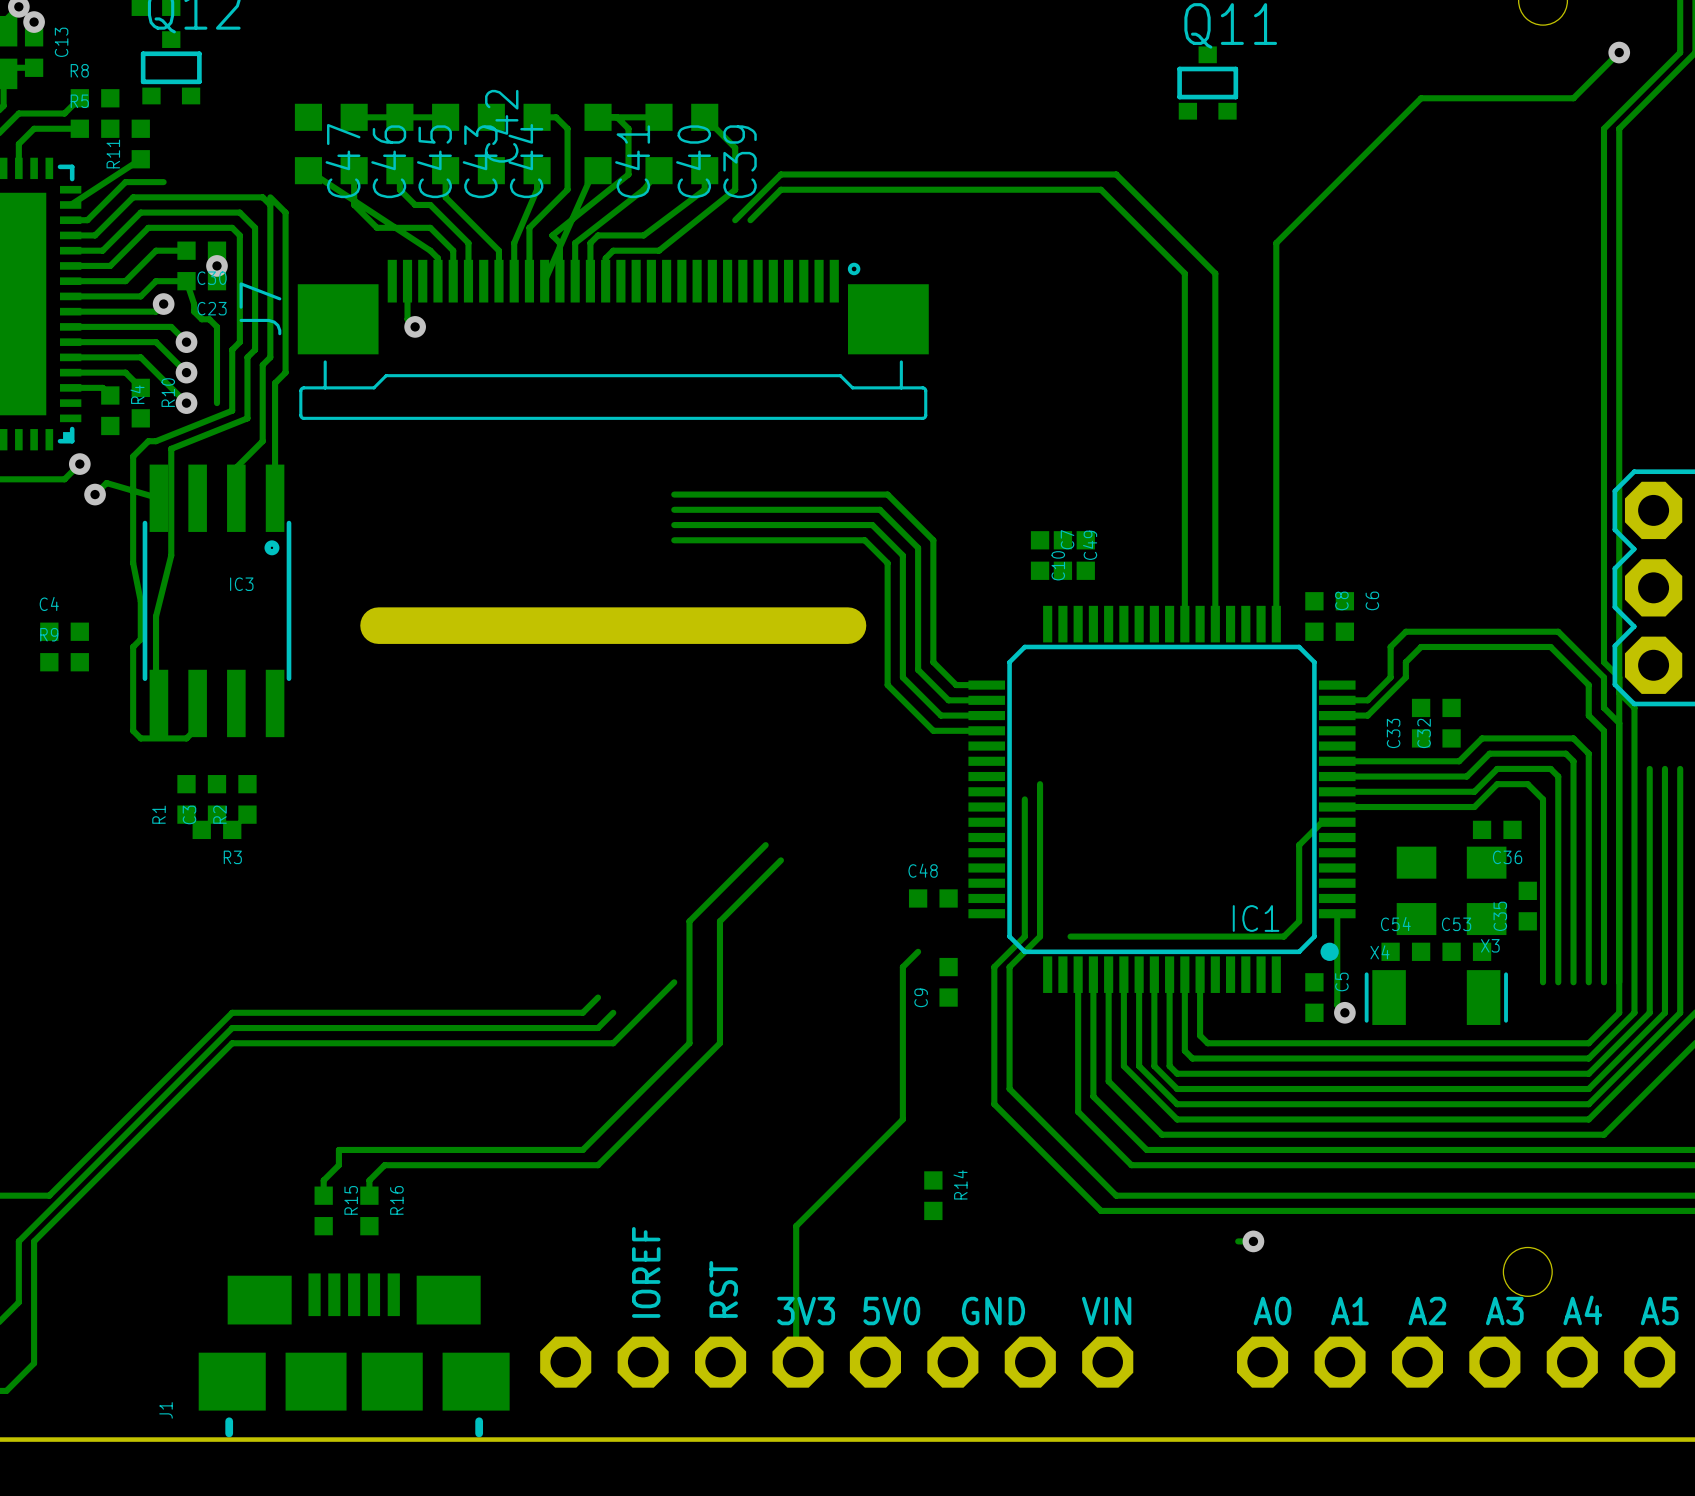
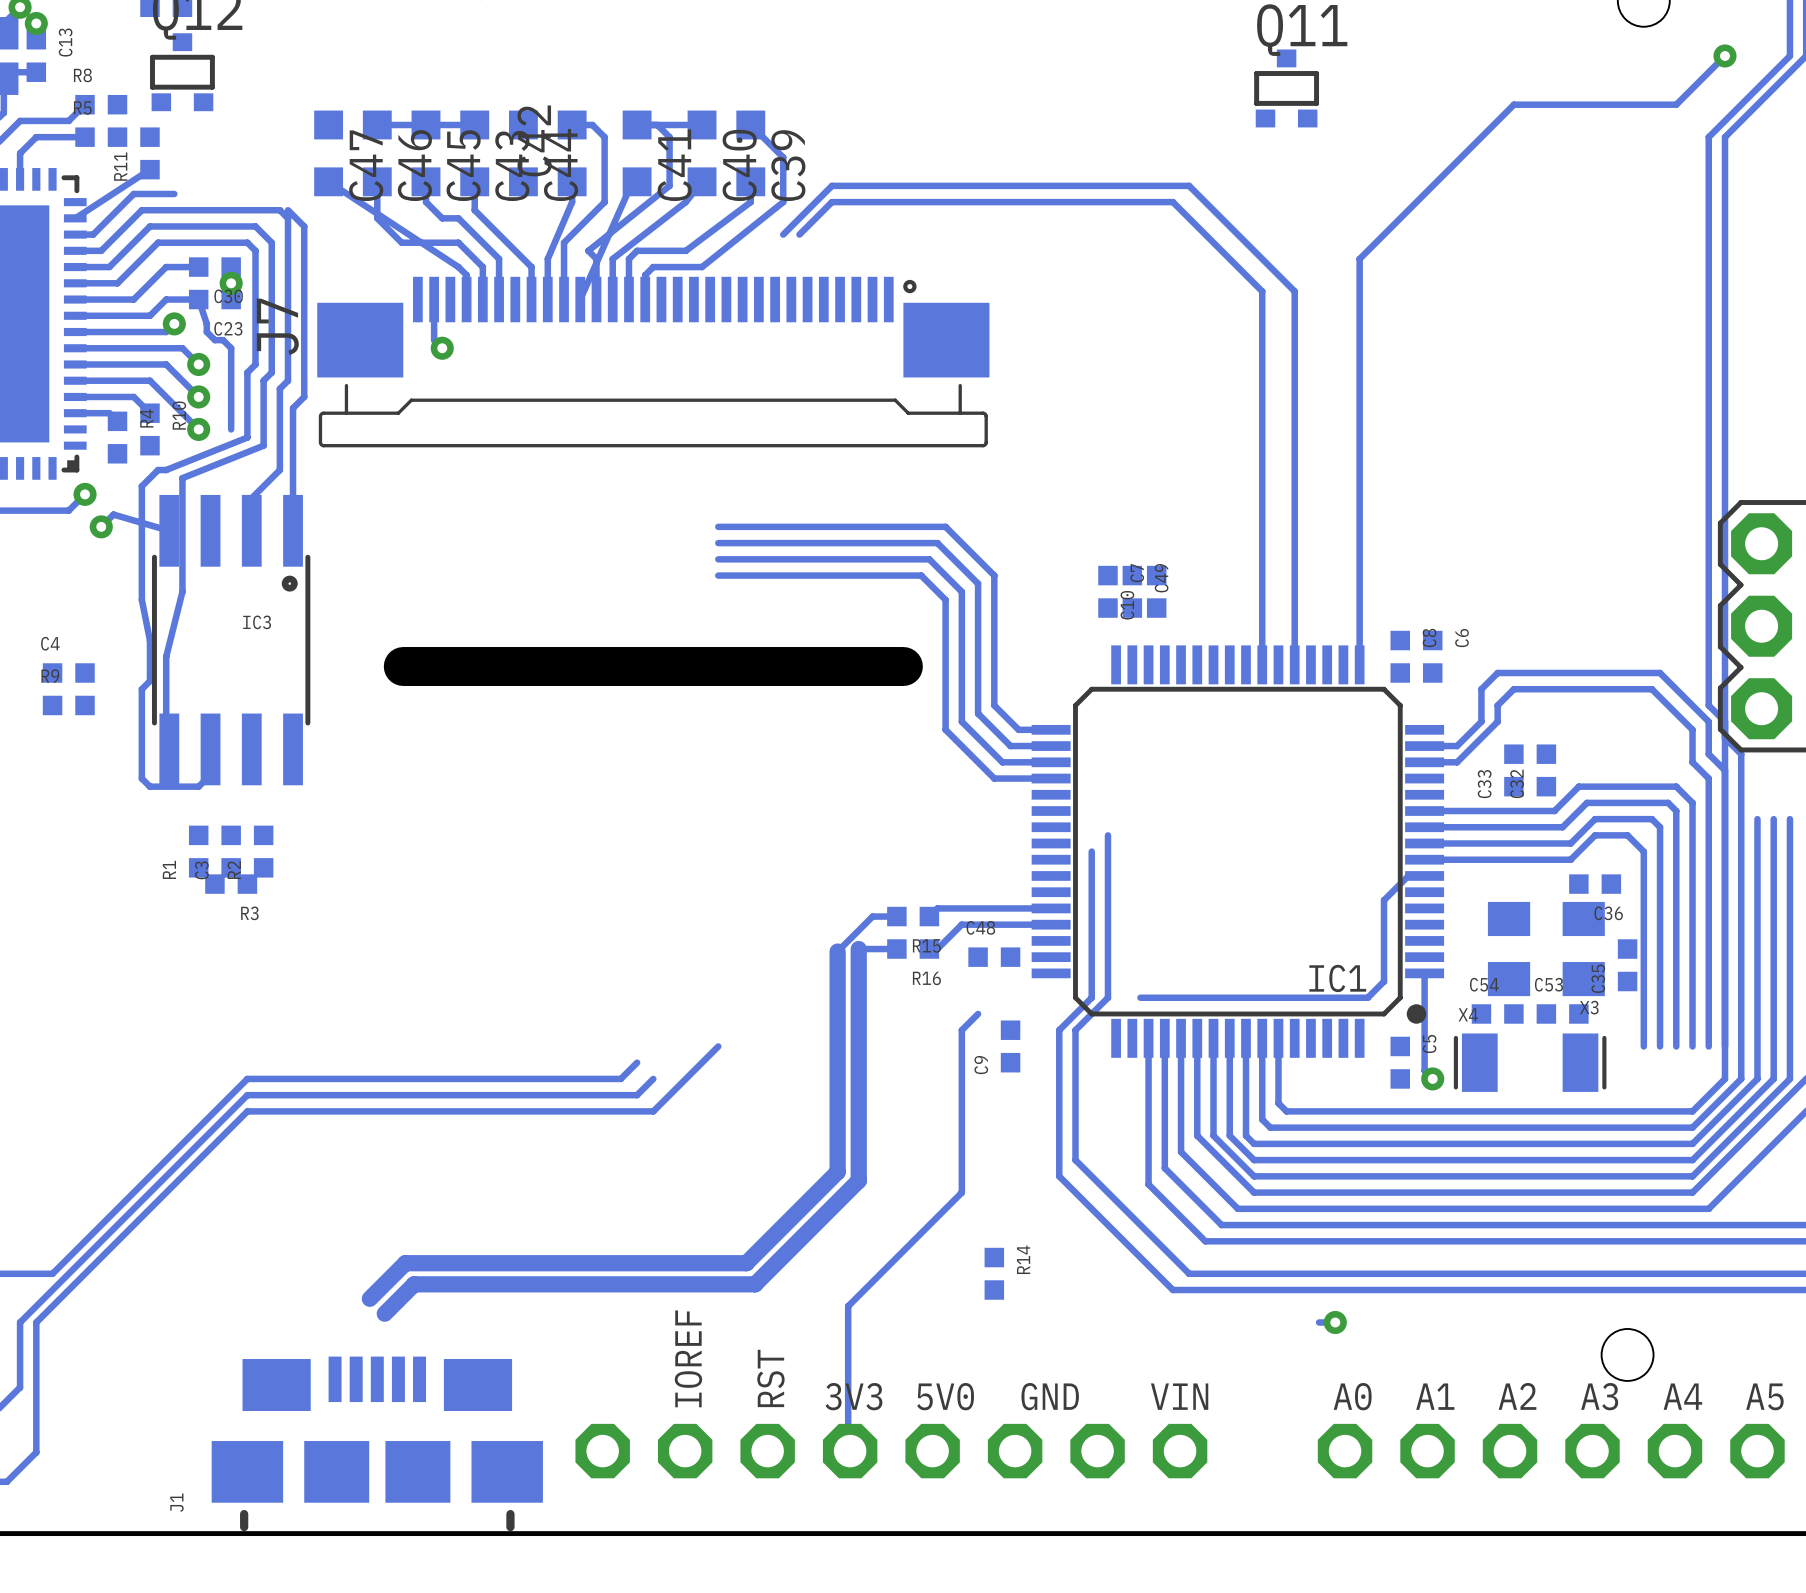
track: (765, 845) (689, 921) (689, 1043) (582, 1149) (338, 1149) (338, 1165) (323, 1180) (323, 1195) -> none
track: none -> (1051, 908) (937, 908) (929, 916)
track: (780, 860) (719, 921) (719, 1043) (598, 1165) (384, 1165) (369, 1180) (369, 1195) -> none
track: none -> (896, 916) (872, 916) (837, 951) (837, 1171) (746, 1263) (405, 1263) (369, 1298)
track: none -> (1051, 924) (961, 924) (933, 953)
track: none -> (896, 949) (858, 949) (858, 1180) (755, 1284) (414, 1284) (384, 1313)
R15 rotation: 0° (323, 1210) -> 90° clockwise (913, 916)
R15 position: (323, 1210) -> (913, 916)
R16 rotation: 0° (369, 1210) -> 90° clockwise (913, 949)
R16 position: (369, 1210) -> (913, 949)

